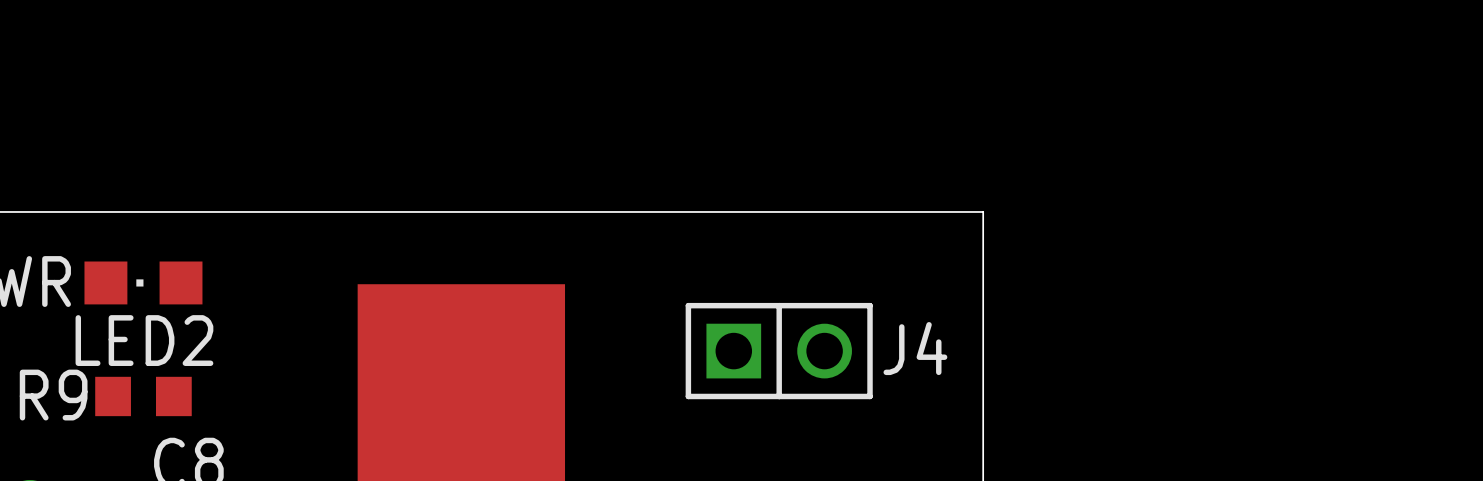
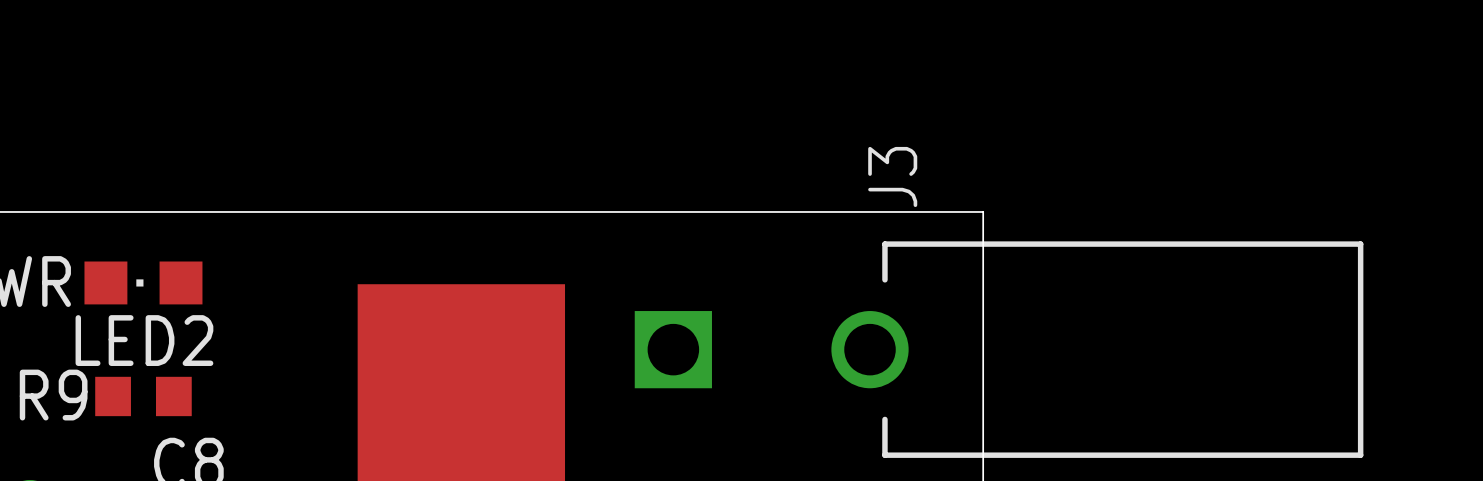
J3: none -> (999, 349)
J4: (779, 351) -> none

